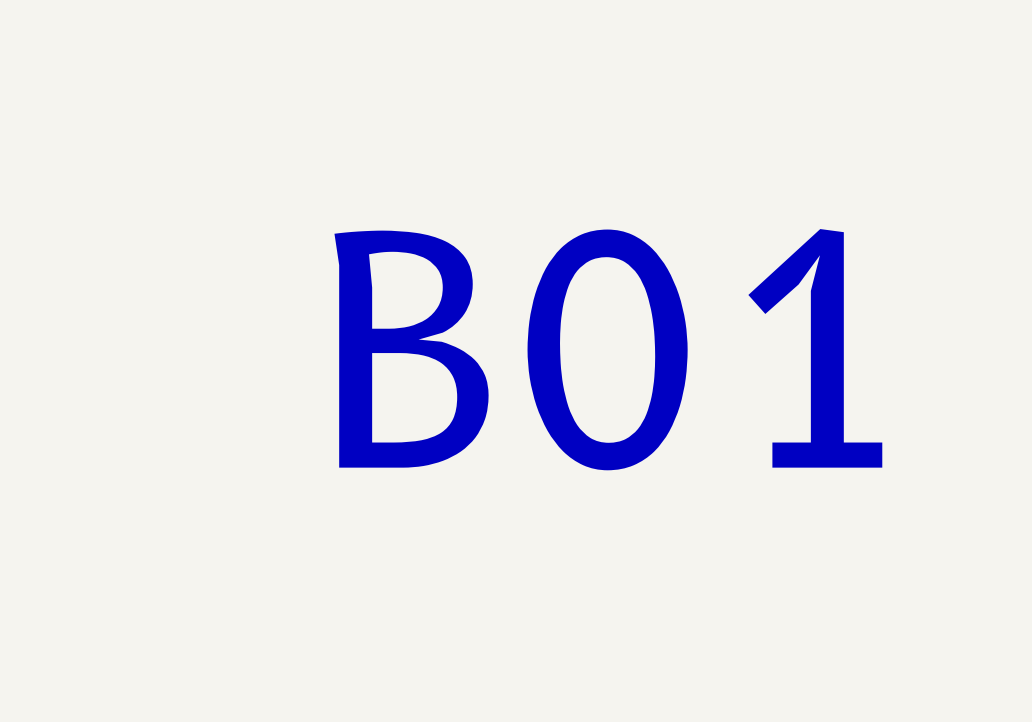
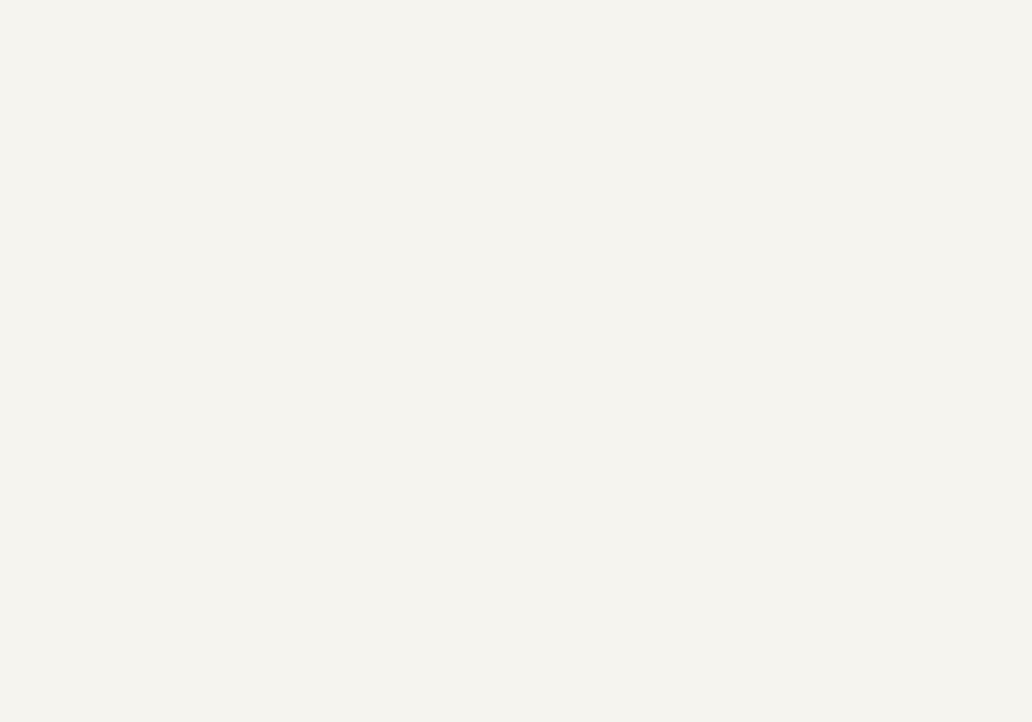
text: B01 (608, 349) -> none

